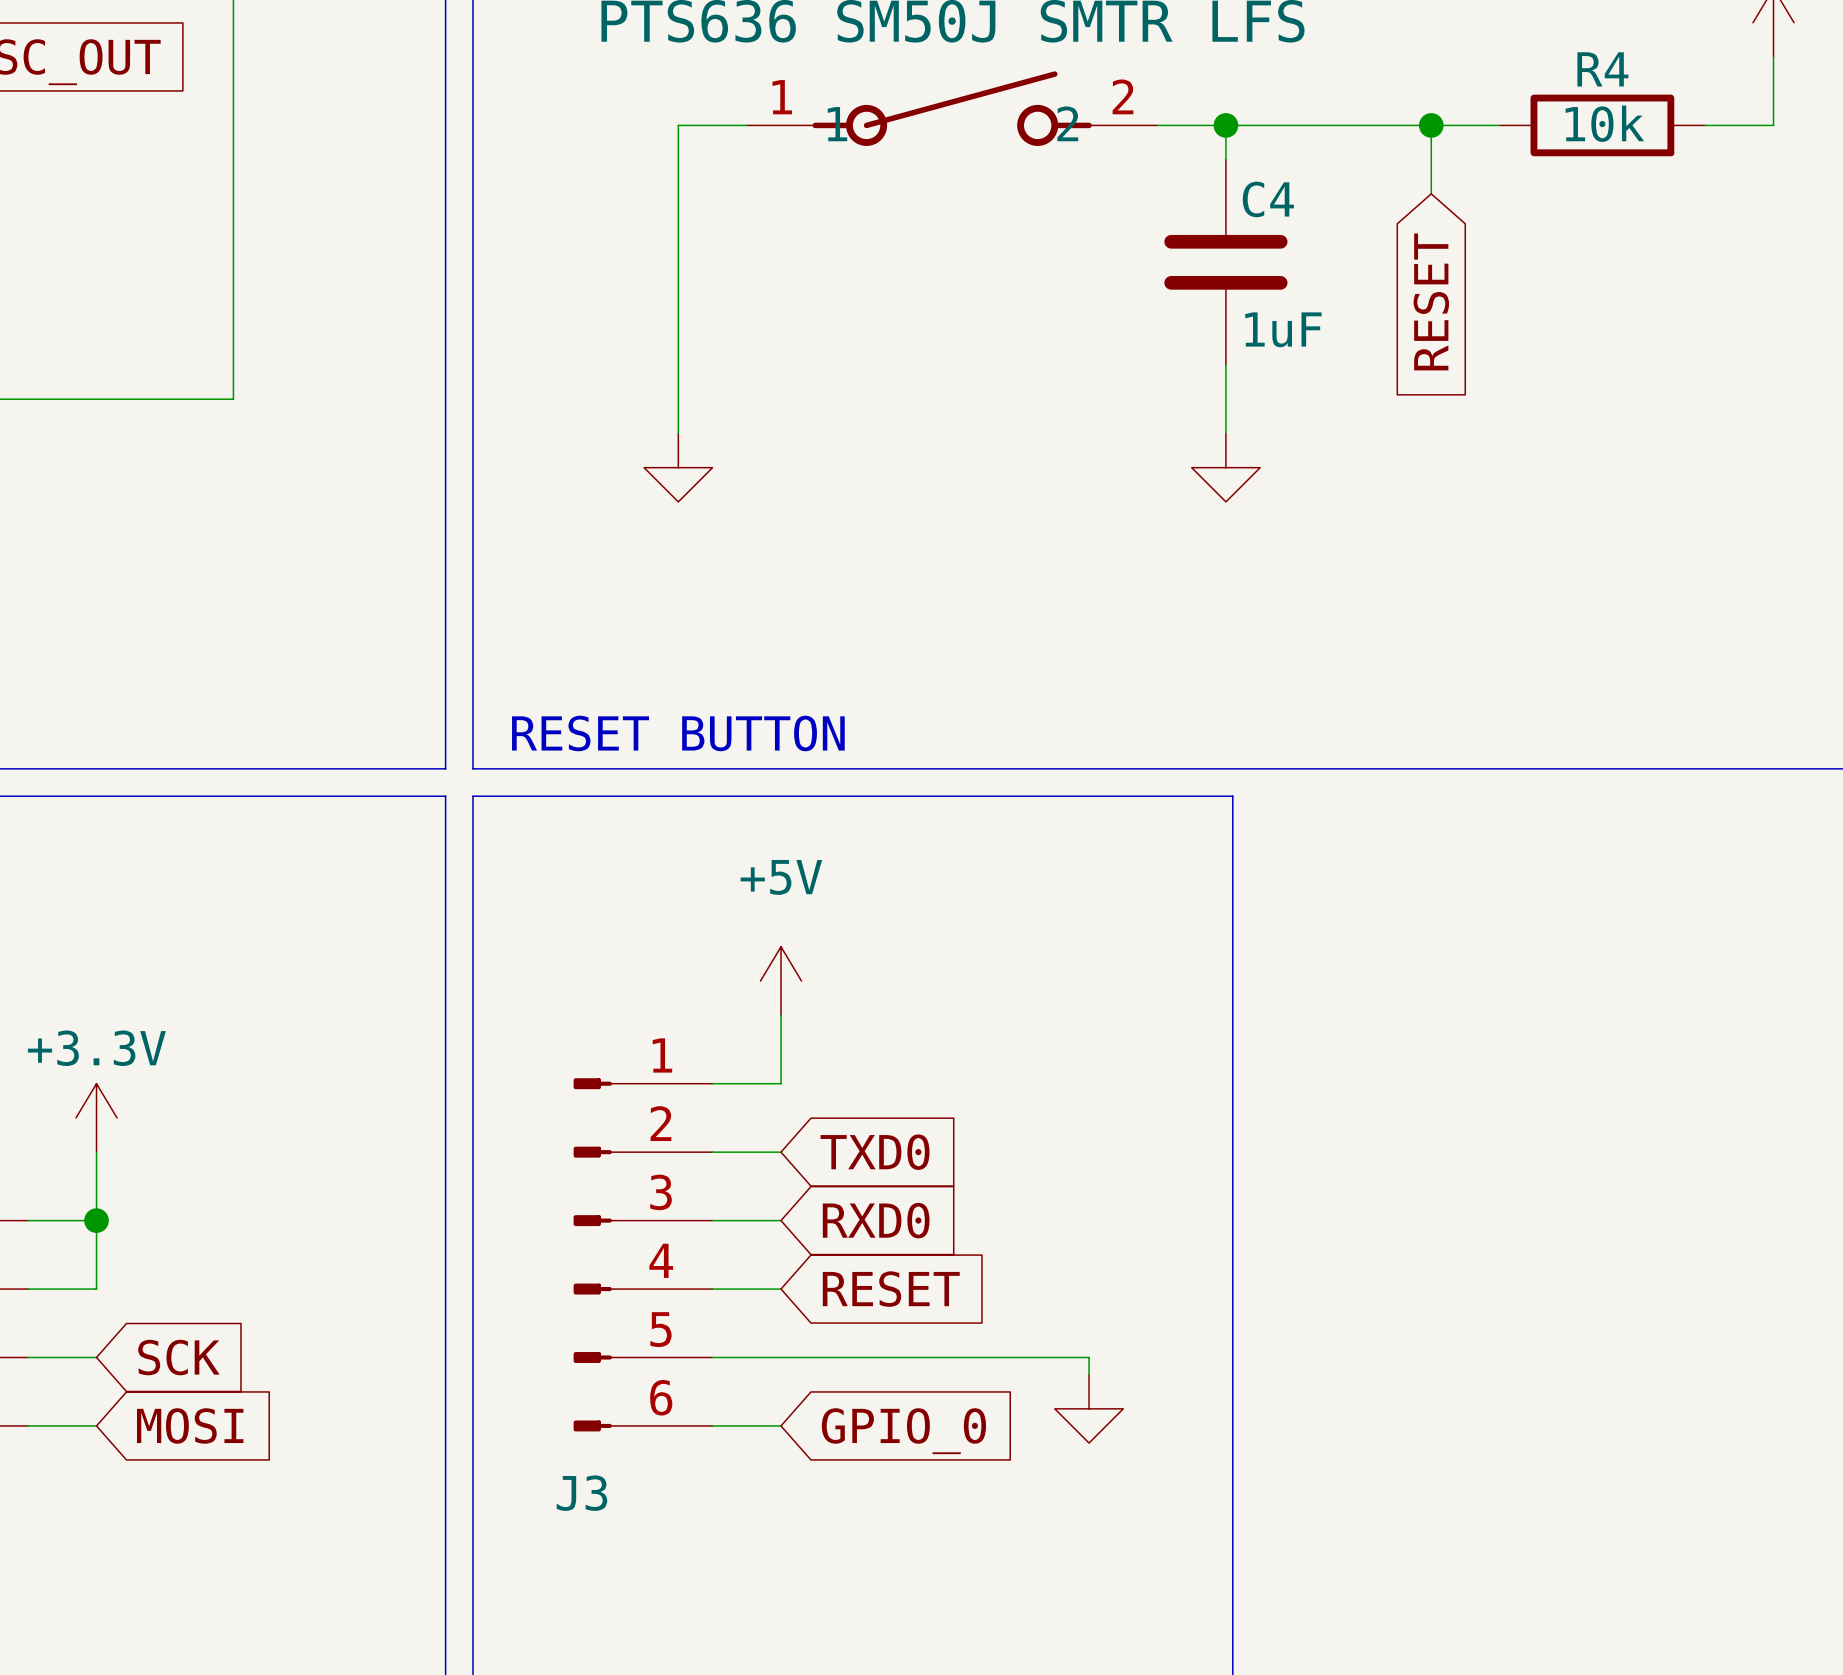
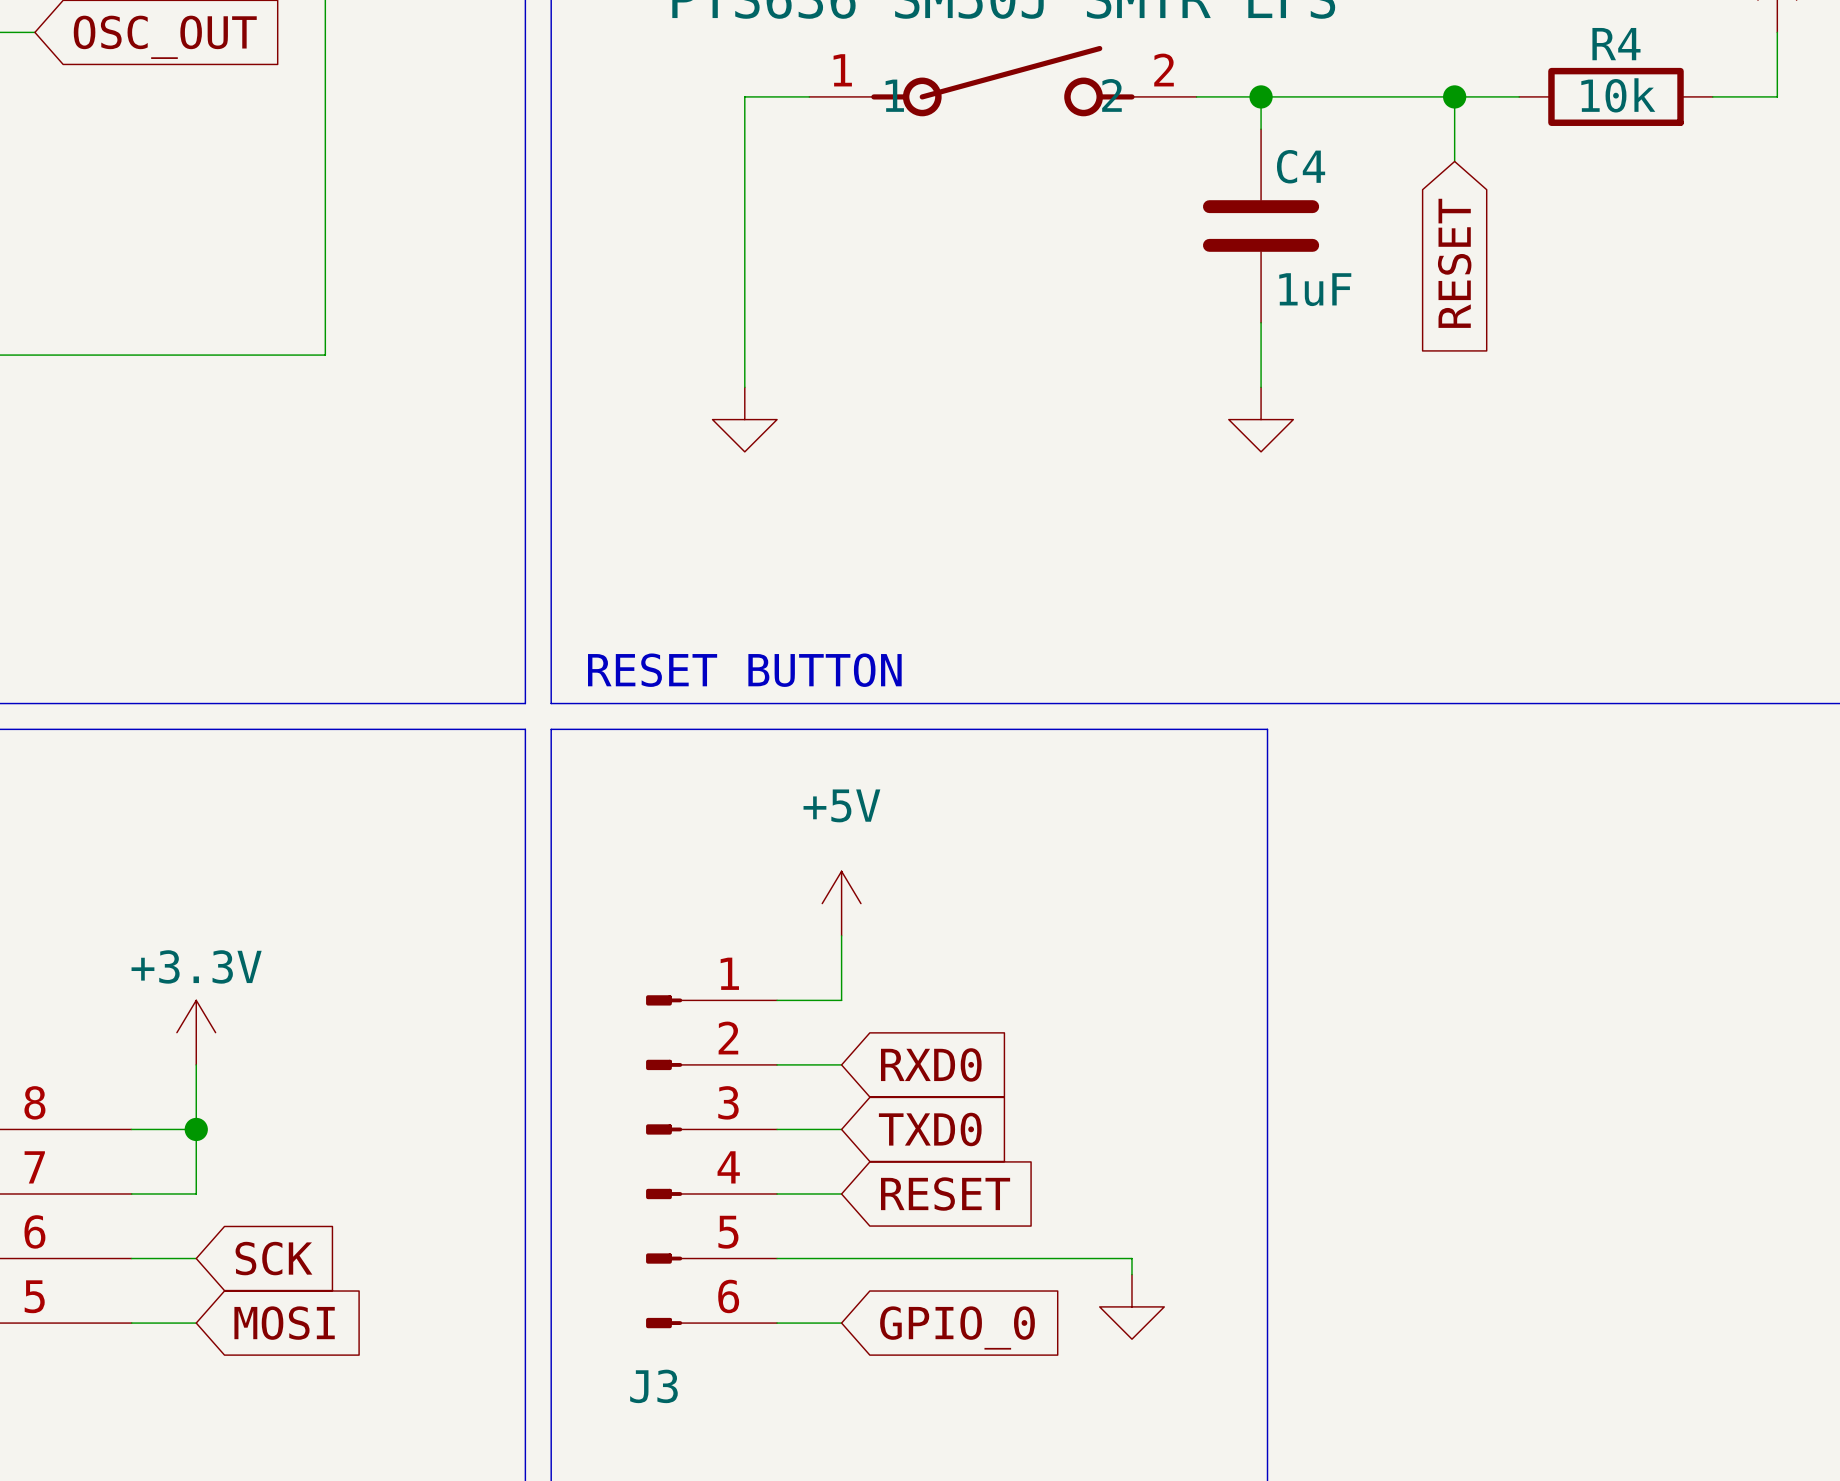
global label: TXD0 (875, 1152) -> RXD0 (931, 1064)
global label: RXD0 (876, 1220) -> TXD0 (930, 1129)

